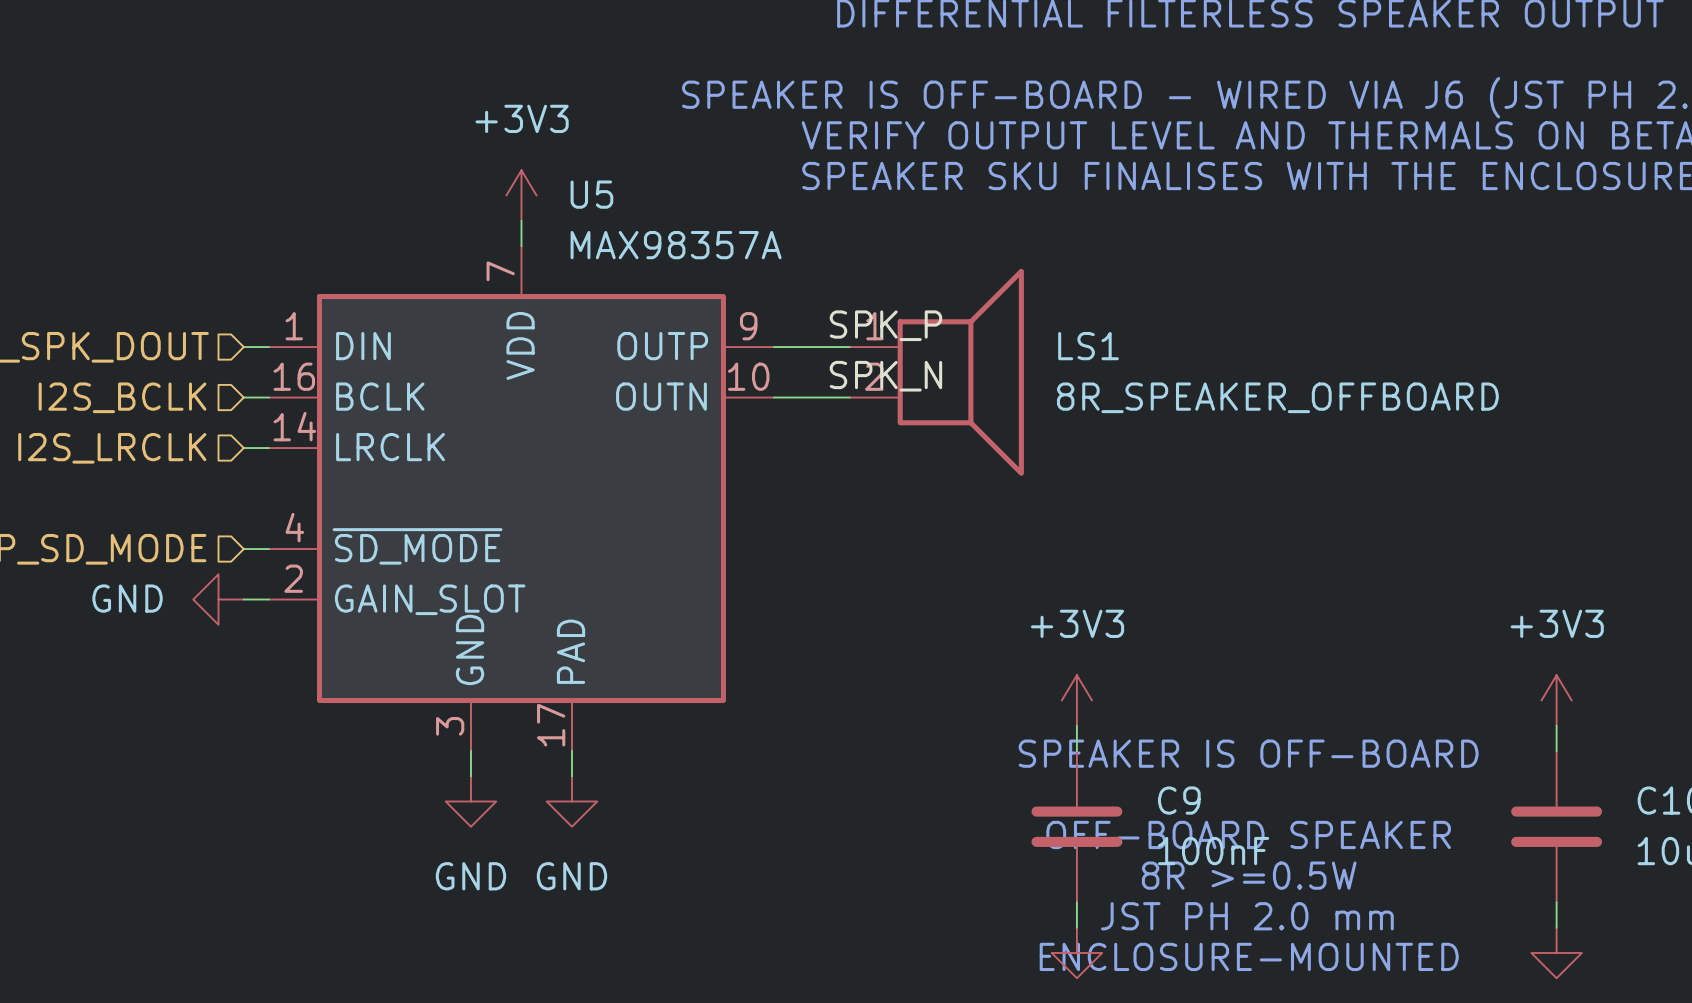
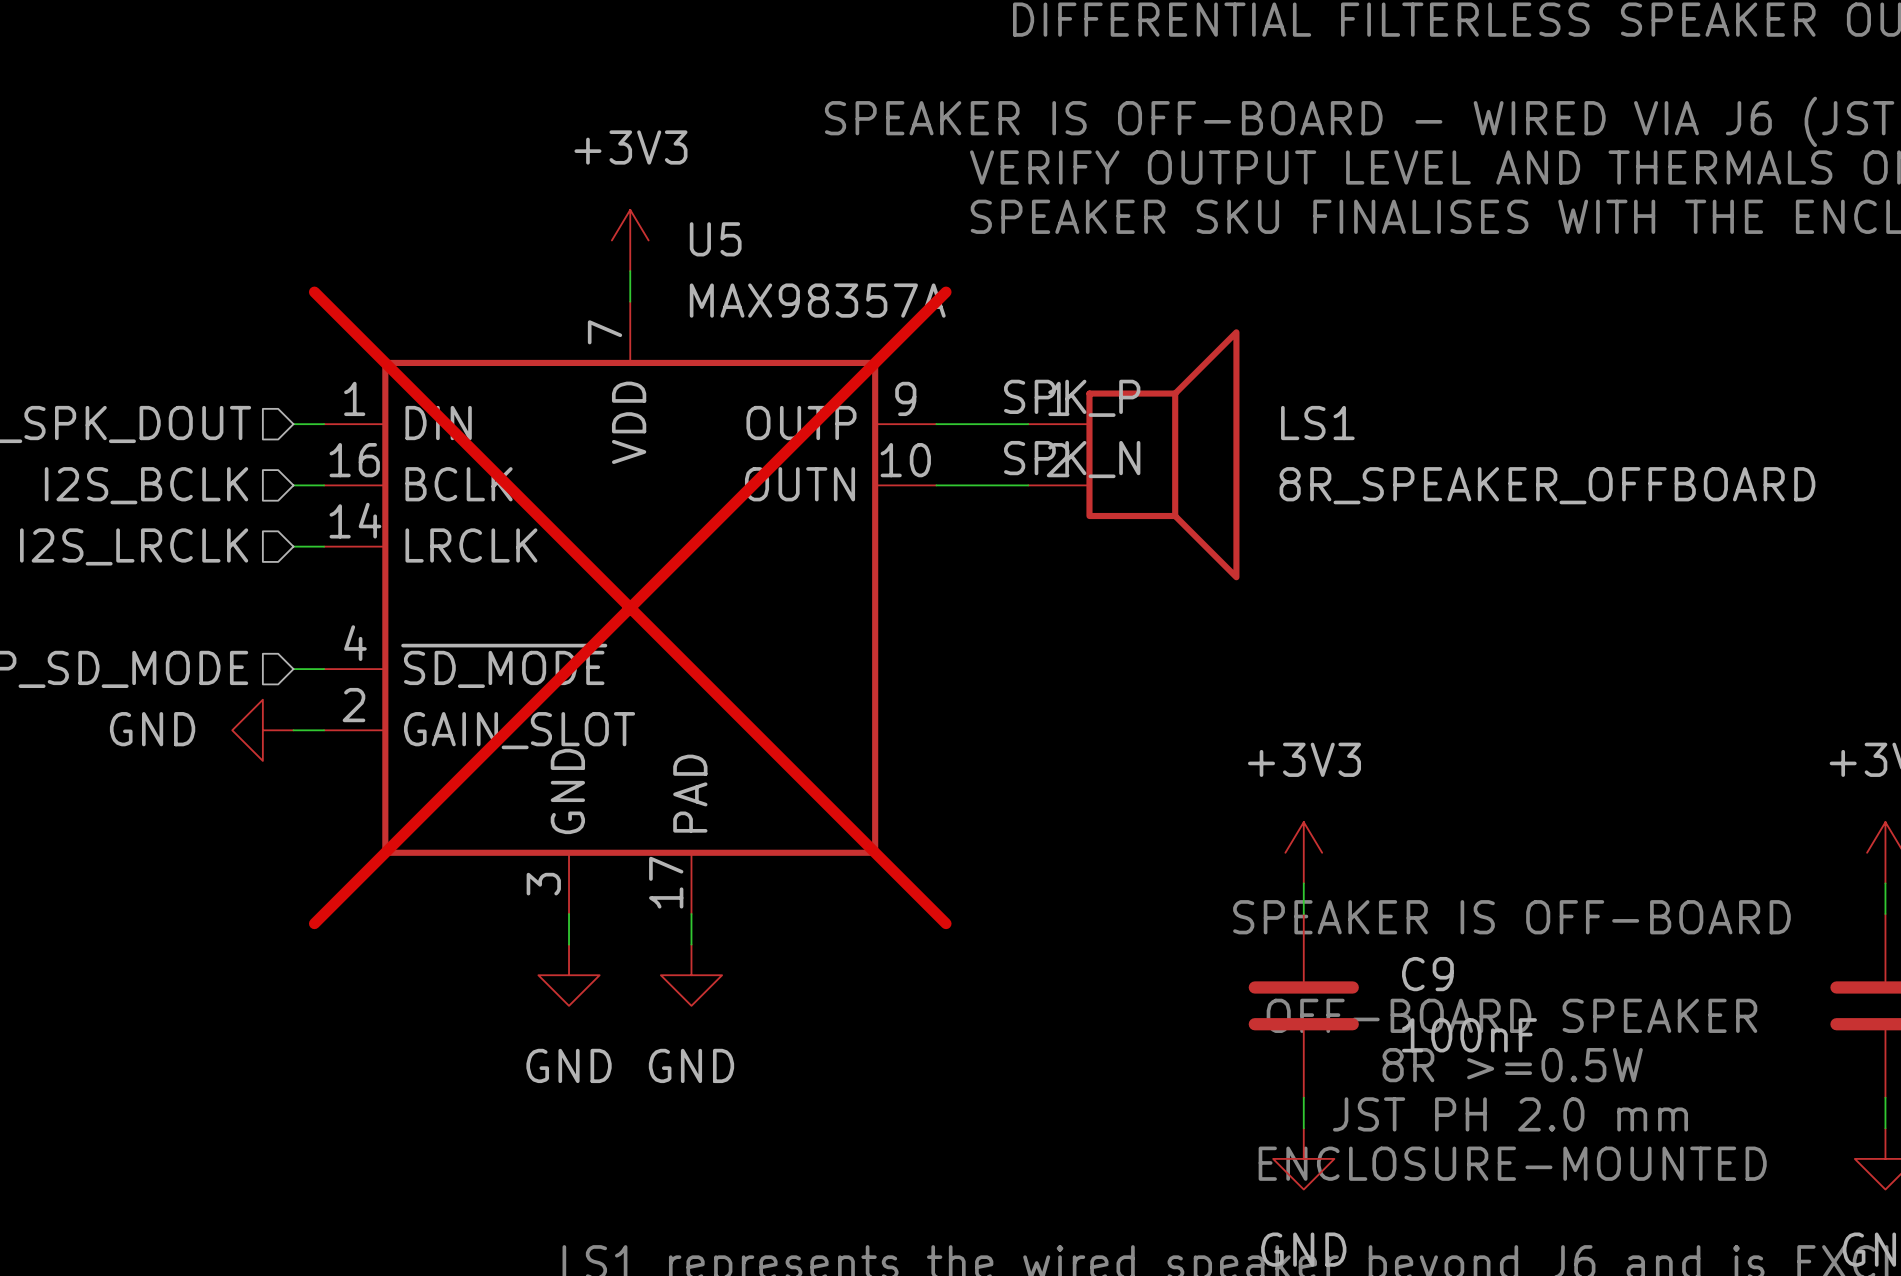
U5 do-not-place cross: none -> (630, 607)

